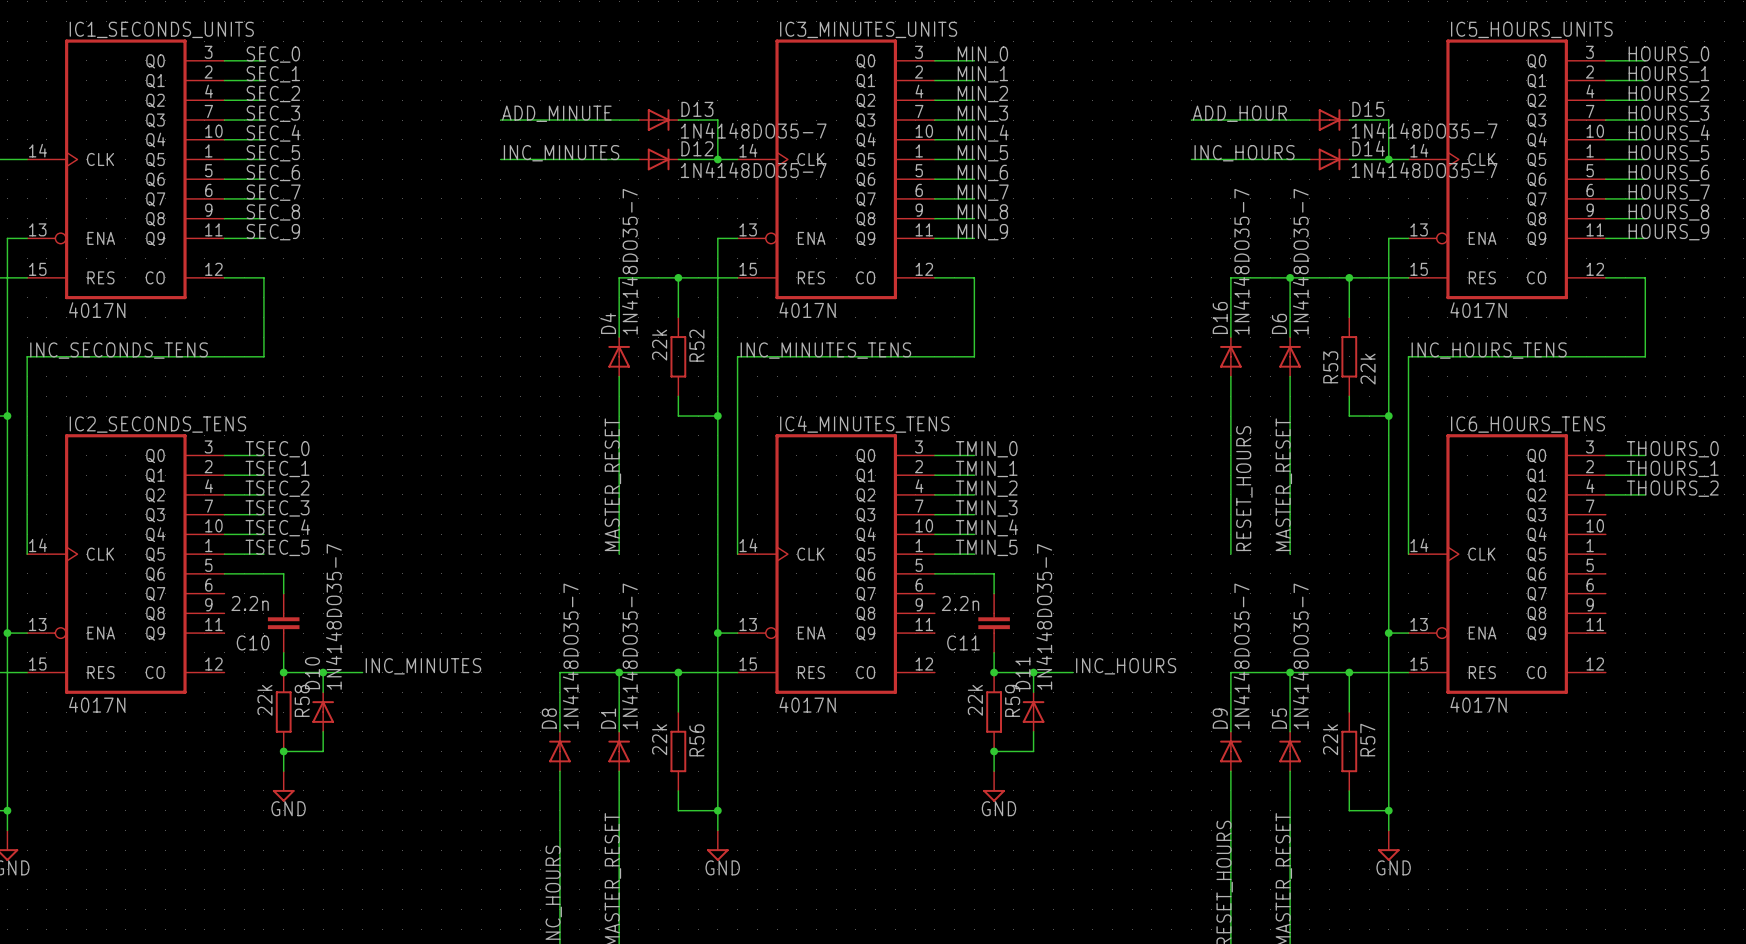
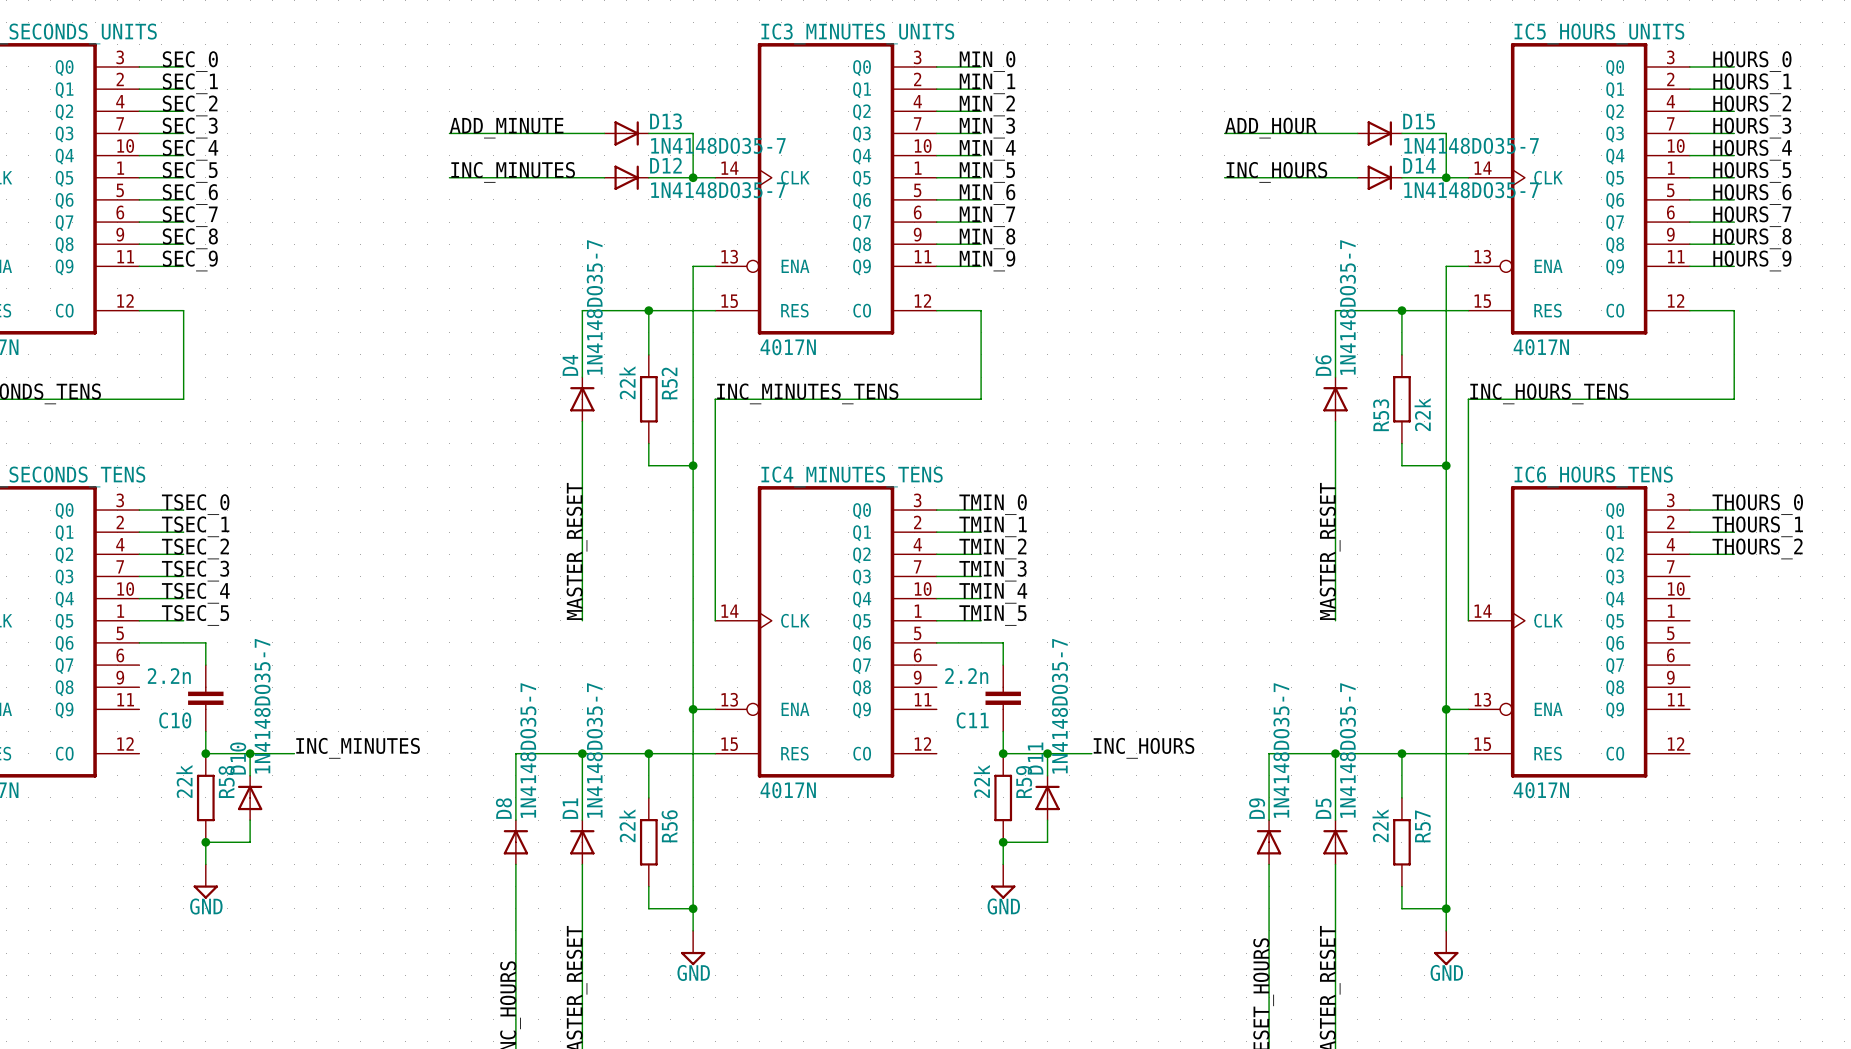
wire: (1290, 277) (1230, 277) (1230, 337) -> none
junction: (1290, 277) -> none
D16: 1N4148DO35-7 (1230, 356) -> none
wire: (1230, 376) (1230, 554) -> none
label: RESET_HOURS (1244, 488) -> none

